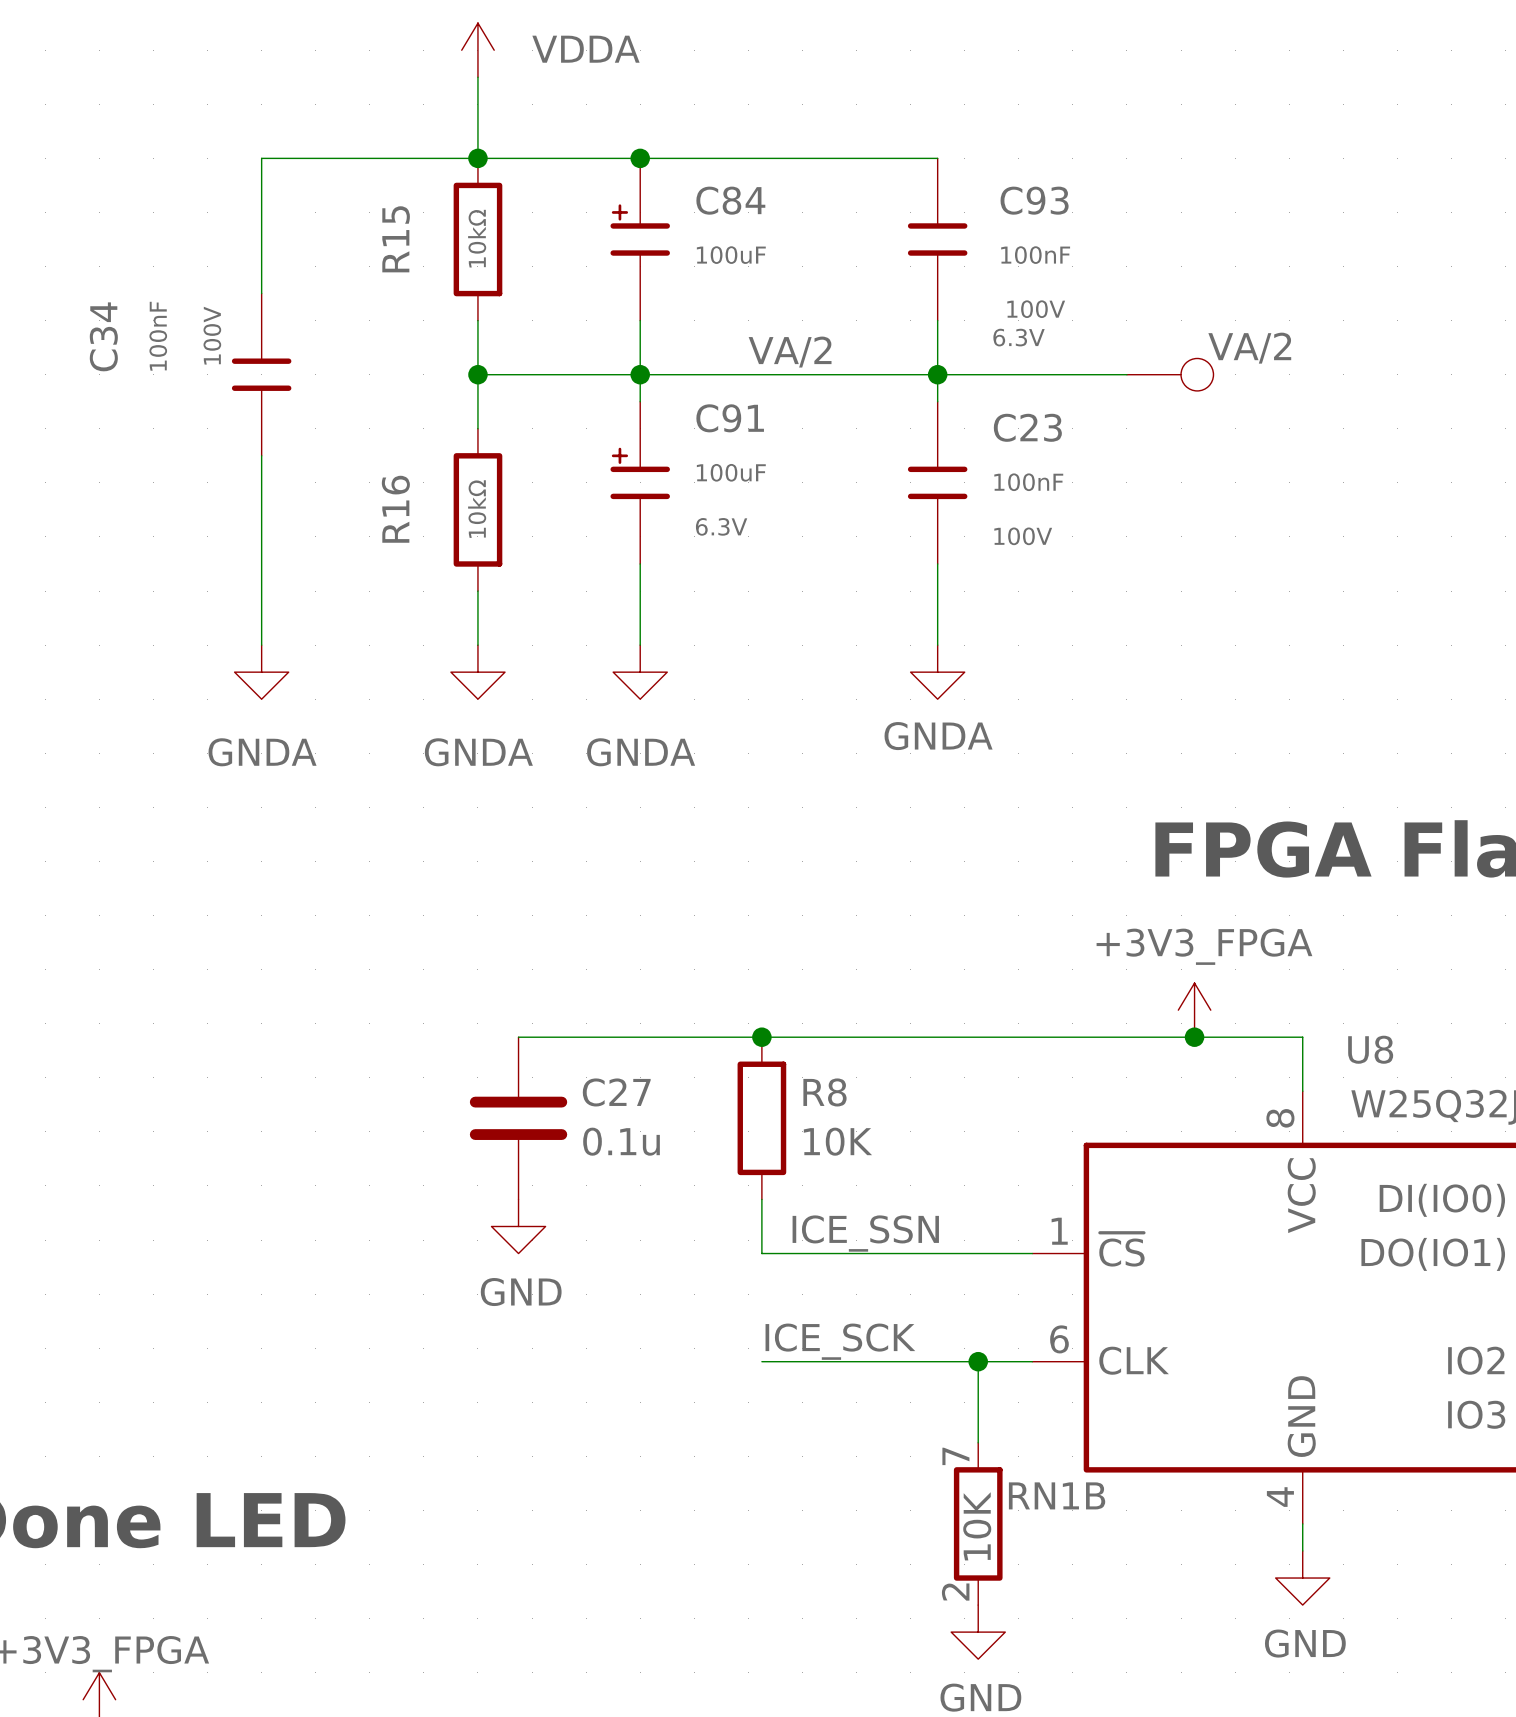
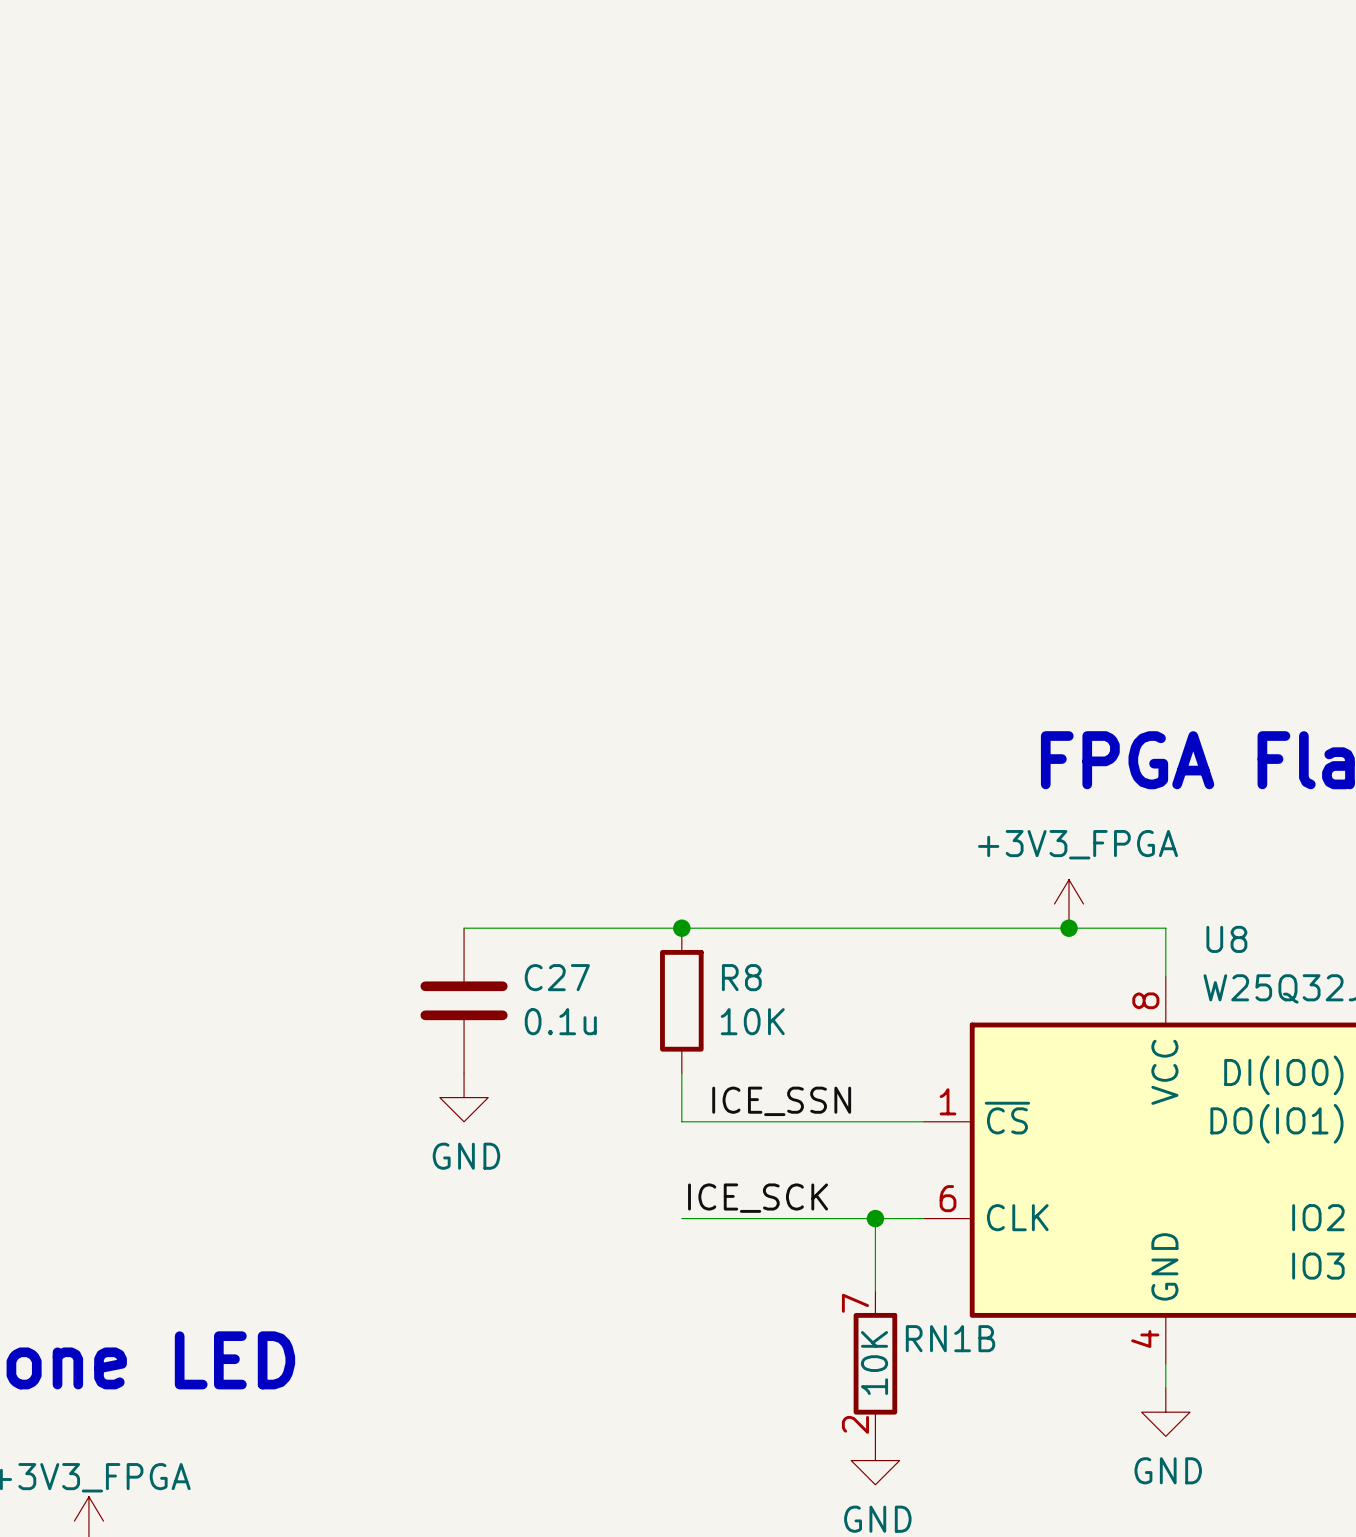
power symbol: VDDA (477, 50) -> none
wire: (477, 77) (477, 158) -> none
junction: (477, 158) -> none
junction: (640, 158) -> none
wire: (937, 158) (261, 158) (261, 293) -> none
R15: 10kΩ (477, 239) -> none
C84: 100uF (640, 239) -> none
C93: 100nF (937, 239) -> none
wire: (477, 320) (477, 428) -> none
wire: (640, 320) (640, 401) -> none
wire: (937, 320) (937, 401) -> none
label: VA/2 (790, 352) -> none
C34: 100nF (261, 374) -> none
wire: (477, 374) (1126, 374) -> none
junction: (477, 374) -> none
junction: (640, 374) -> none
junction: (937, 374) -> none
part: VA/2 (1170, 374) -> none
wire: (261, 455) (261, 645) -> none
C91: 100uF (640, 482) -> none
C23: 100nF (937, 482) -> none
R16: 10kΩ (477, 509) -> none
wire: (640, 563) (640, 645) -> none
wire: (937, 563) (937, 645) -> none
wire: (477, 591) (477, 645) -> none
power symbol: GNDA (261, 672) -> none
power symbol: GNDA (477, 672) -> none
power symbol: GNDA (640, 672) -> none
power symbol: GNDA (937, 672) -> none

